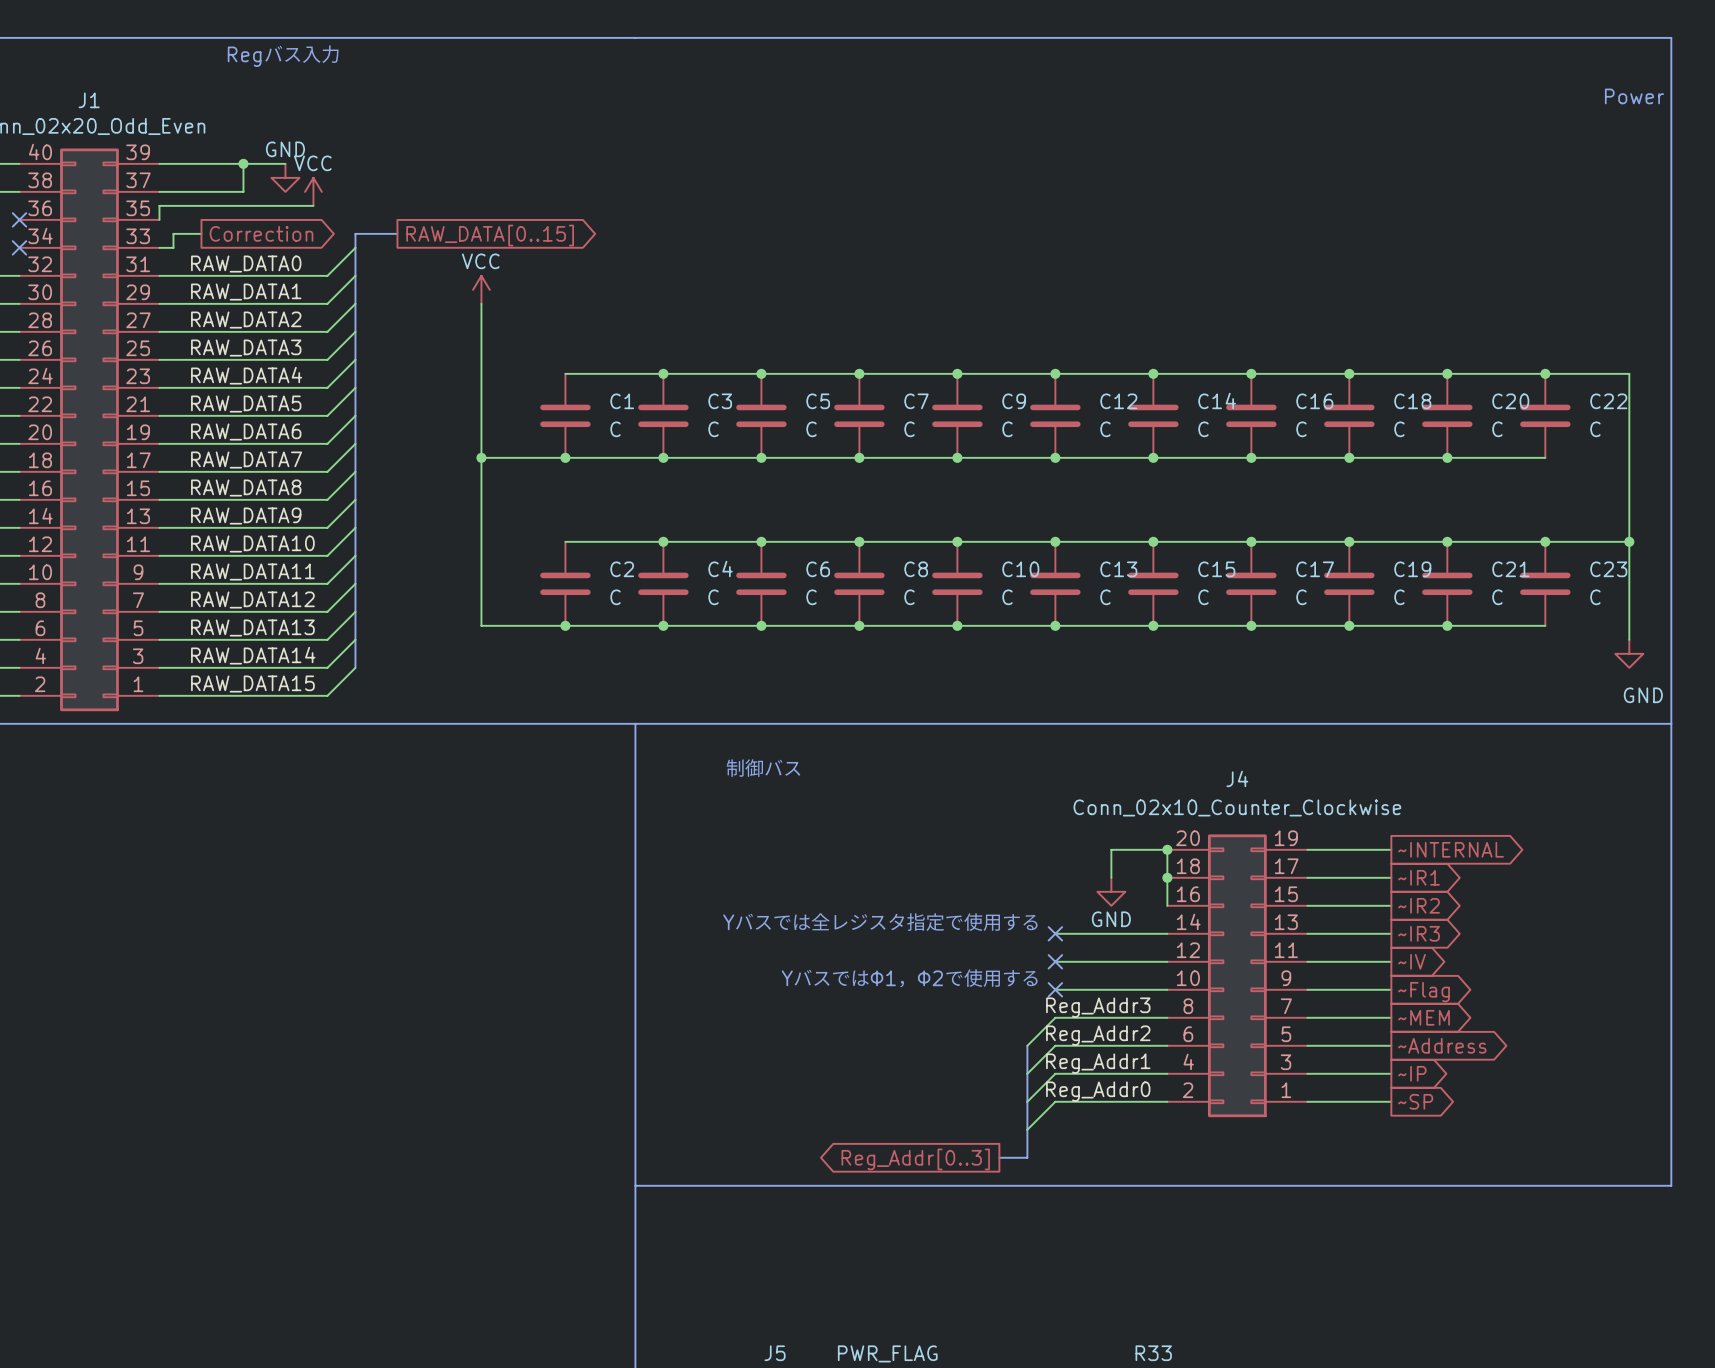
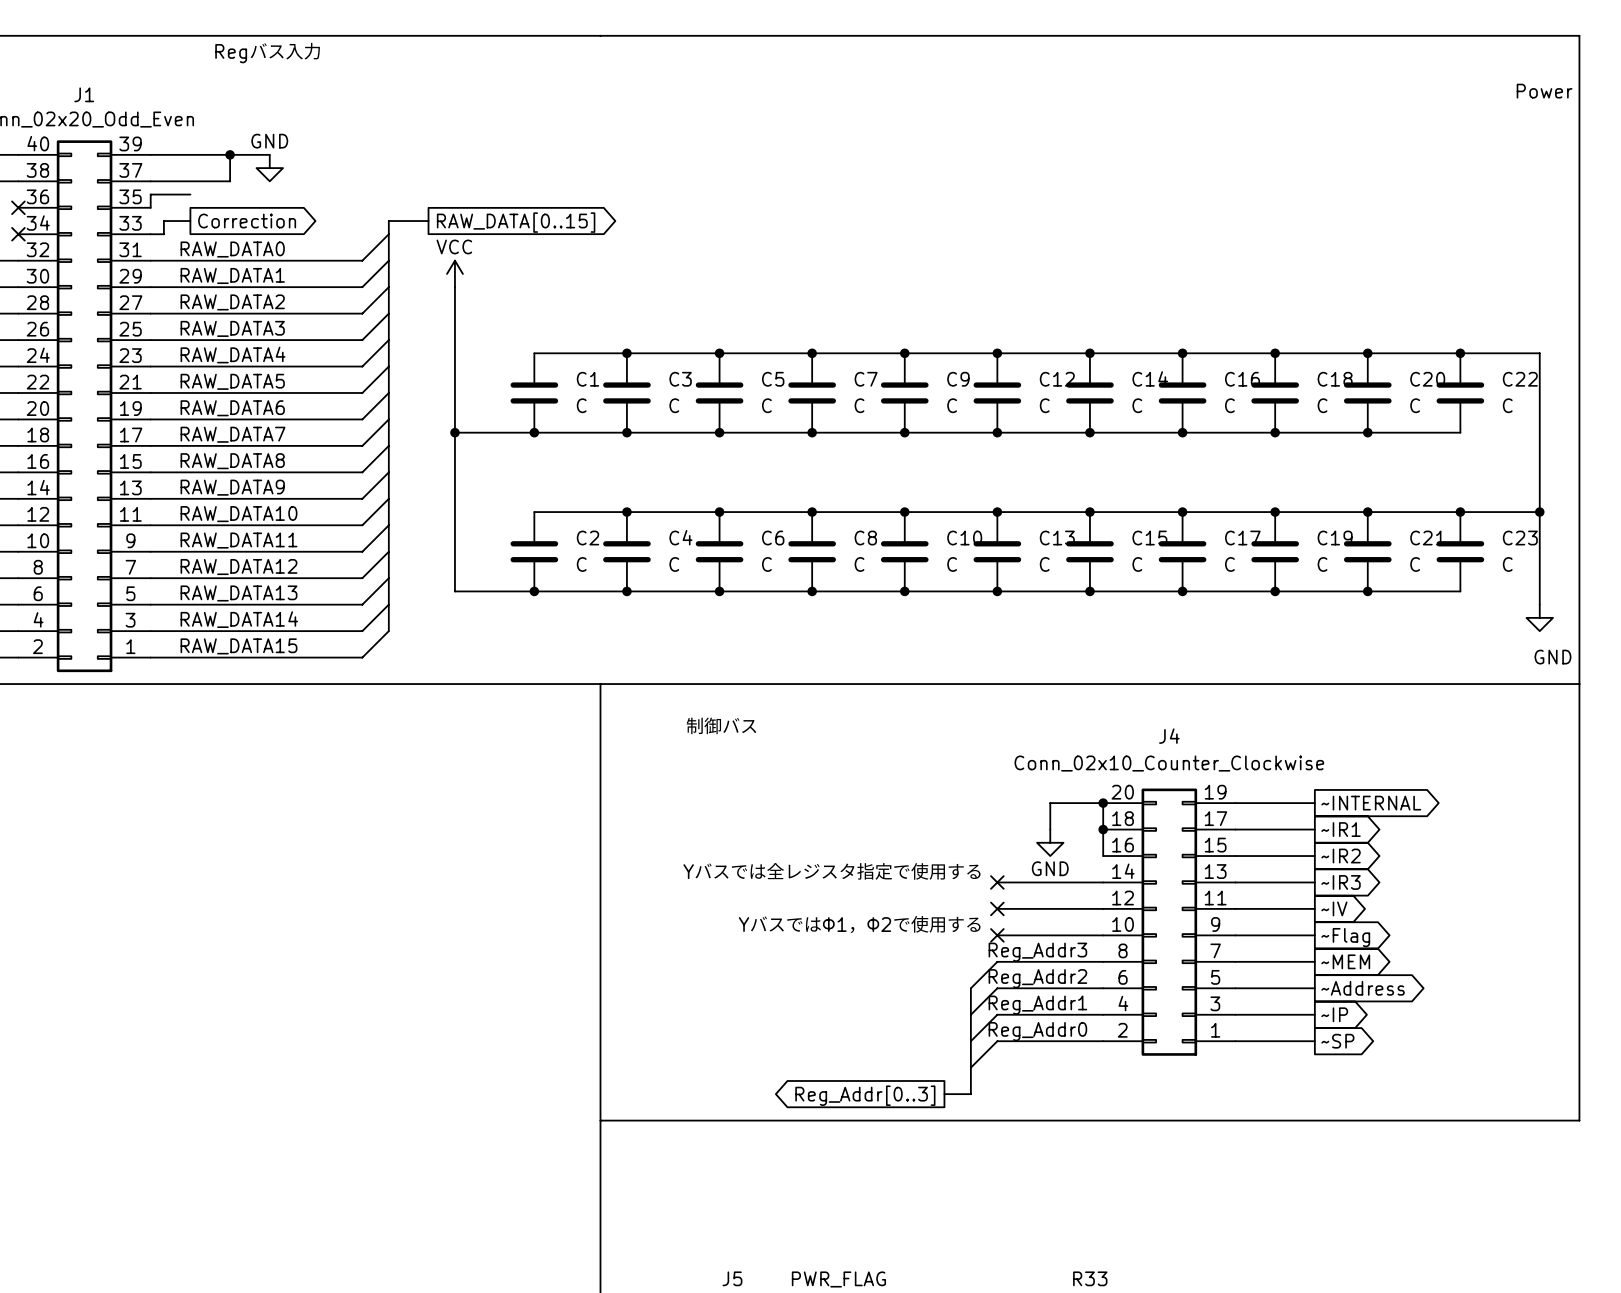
power symbol: VCC (313, 191) -> none
wire: (201, 205) (313, 205) -> none
bus: (397, 233) (355, 233) (355, 667) -> (428, 221) (388, 221) (388, 631)
global label position: RAW_DATA[0..15] (490, 235) -> RAW_DATA[0..15] (516, 222)
wire: (355, 247) (327, 275) -> (388, 234) (362, 260) (309, 260)
wire: (355, 275) (327, 303) -> (388, 260) (362, 287) (309, 287)
wire: (355, 303) (327, 331) -> (388, 287) (362, 313) (309, 313)
wire: (355, 331) (327, 359) -> (388, 313) (362, 340) (309, 340)
wire: (355, 359) (327, 387) -> (388, 340) (362, 366) (309, 366)
wire: (355, 387) (327, 415) -> (388, 366) (362, 392) (309, 392)
wire: (355, 415) (327, 443) -> (388, 392) (362, 419) (309, 419)
wire: (355, 443) (327, 471) -> (388, 419) (362, 445) (309, 445)
wire: (355, 471) (327, 499) -> (388, 445) (362, 472) (309, 472)
wire: (355, 499) (327, 527) -> (388, 472) (362, 498) (309, 498)
wire: (355, 527) (327, 555) -> (388, 498) (362, 525) (309, 525)
wire: (355, 555) (327, 583) -> (388, 525) (362, 551) (309, 551)
wire: (355, 583) (327, 611) -> (388, 551) (362, 578) (309, 578)
wire: (355, 611) (327, 639) -> (388, 578) (362, 604) (309, 604)
wire: (355, 639) (327, 667) -> (388, 604) (362, 631) (309, 631)
wire: (355, 667) (327, 695) -> (388, 631) (362, 657) (309, 657)

